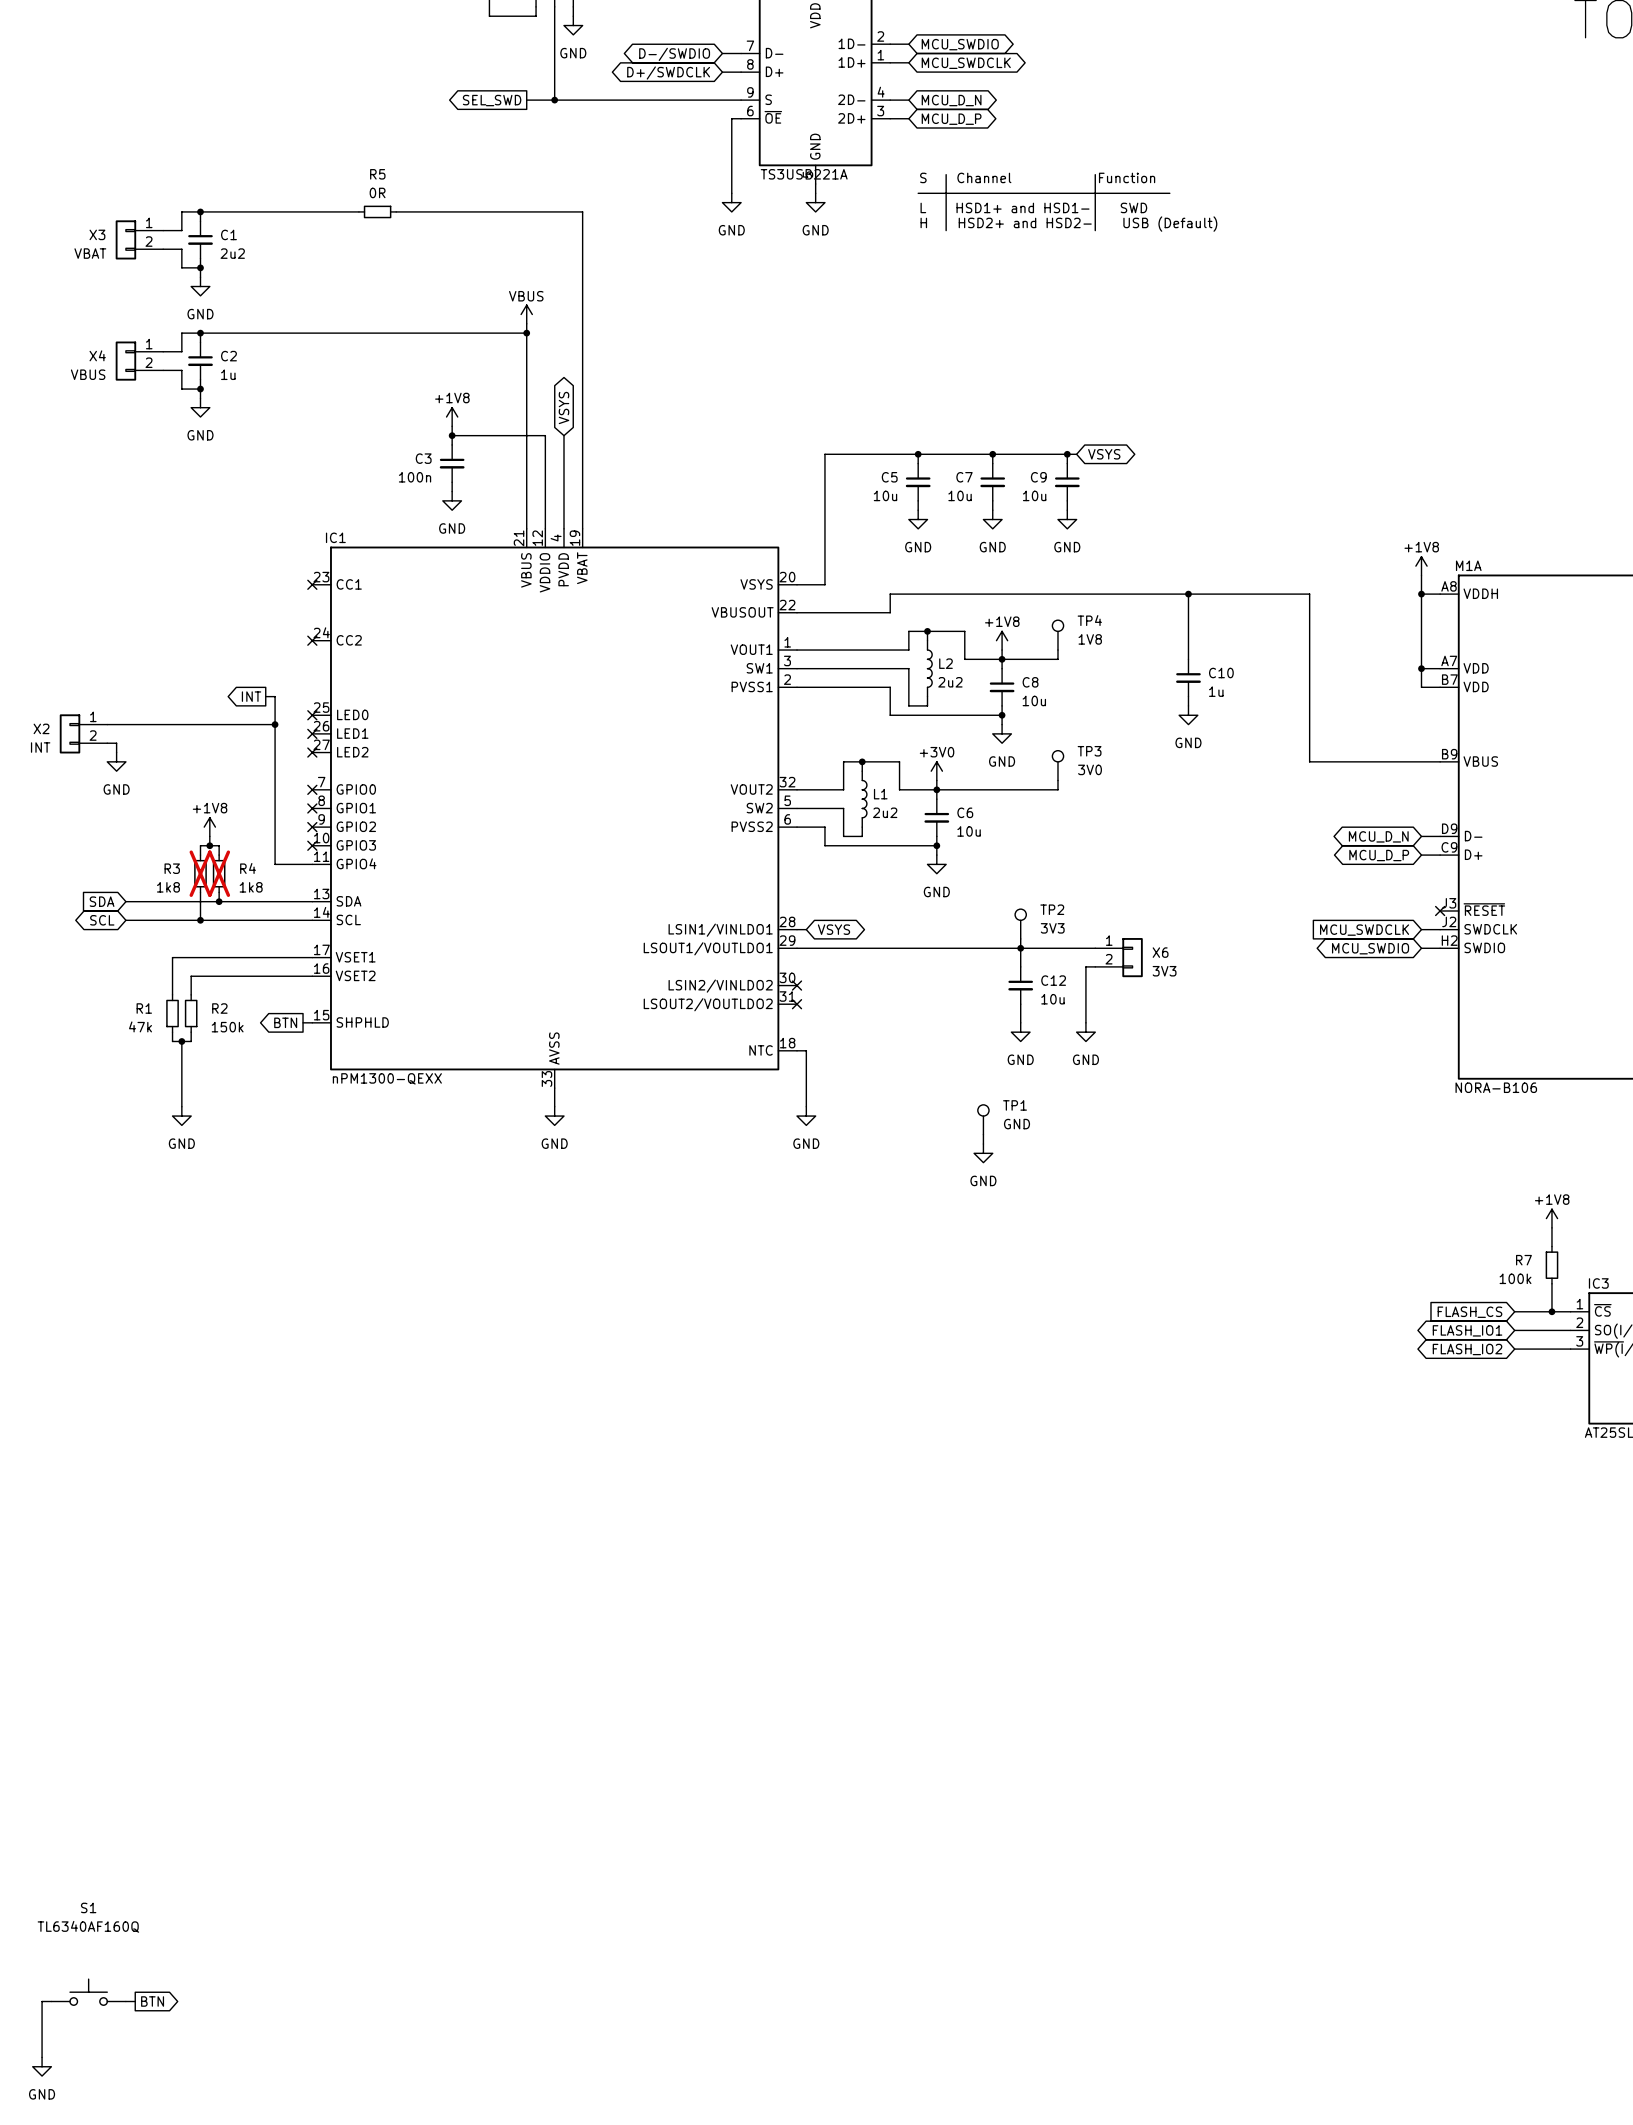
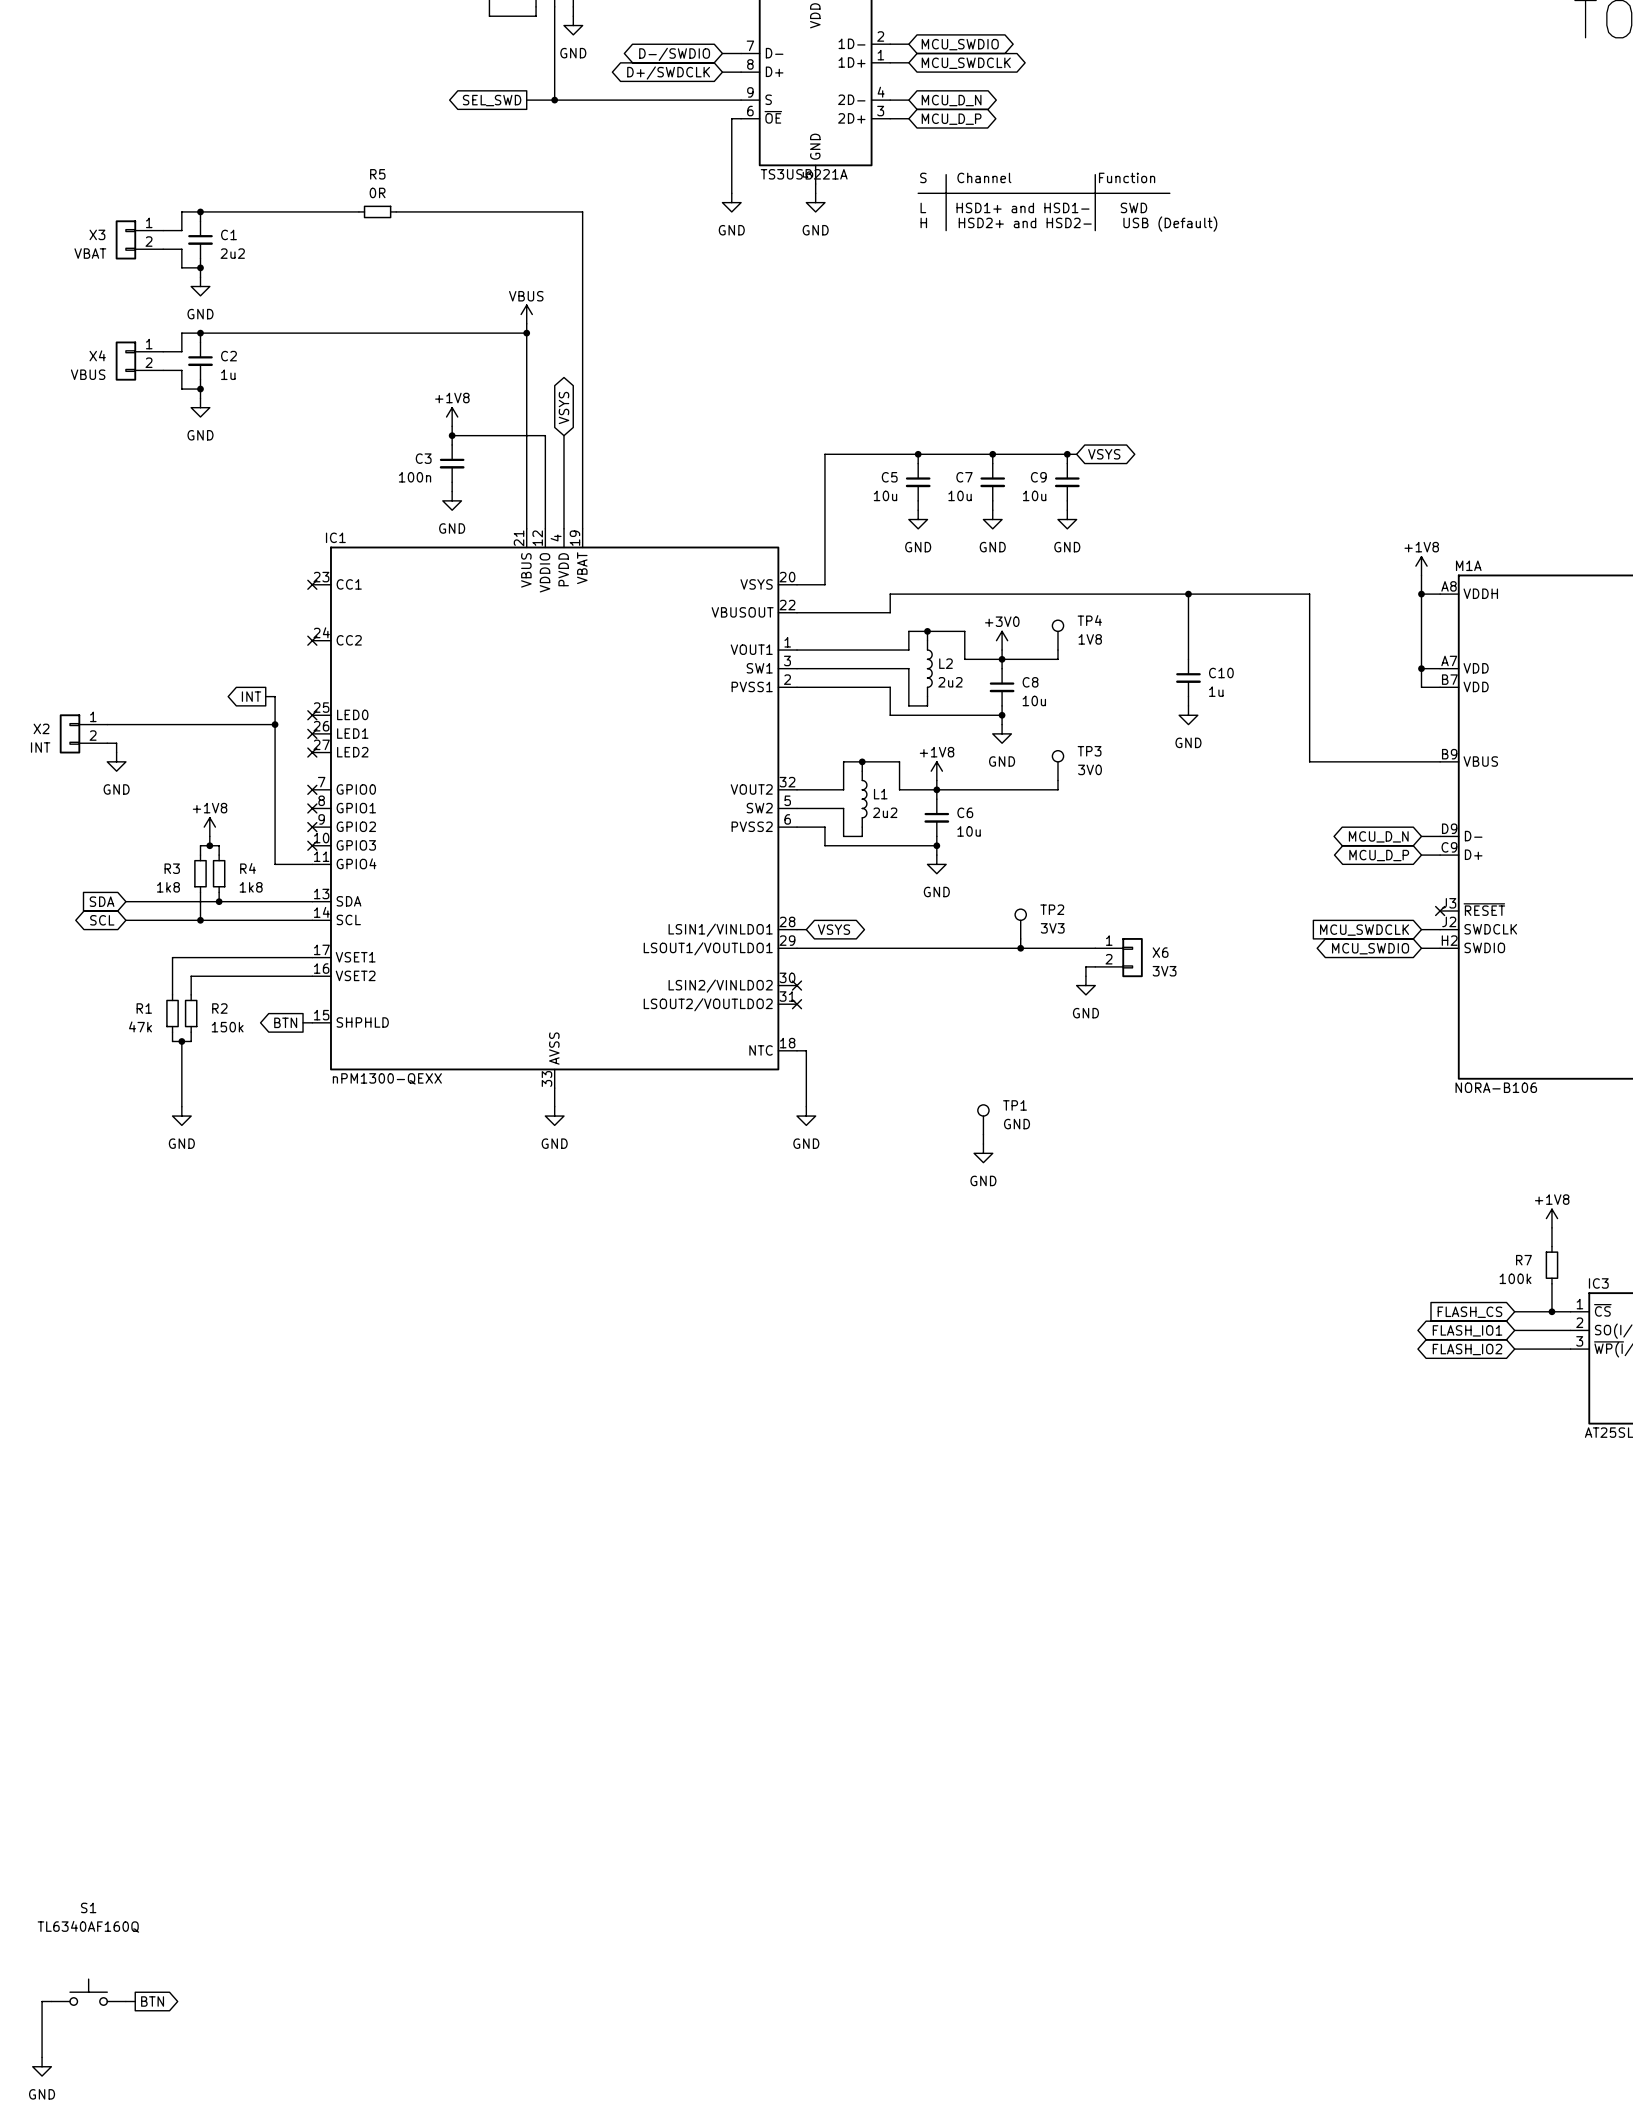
power symbol: +1V8 (1002, 640) -> +3V0 (1002, 640)
power symbol: +3V0 (936, 771) -> +1V8 (936, 771)
R3 do-not-place cross: (200, 873) -> none
R4 do-not-place cross: (219, 873) -> none
wire: (1020, 948) (1020, 966) -> none
wire: (1085, 976) (1085, 1022) -> none
C12: 10u (1020, 985) -> none
power symbol: none -> GND (1085, 985)
wire: (1020, 1004) (1020, 1022) -> none
power symbol: GND (1020, 1032) -> none
power symbol: GND (1085, 1032) -> none

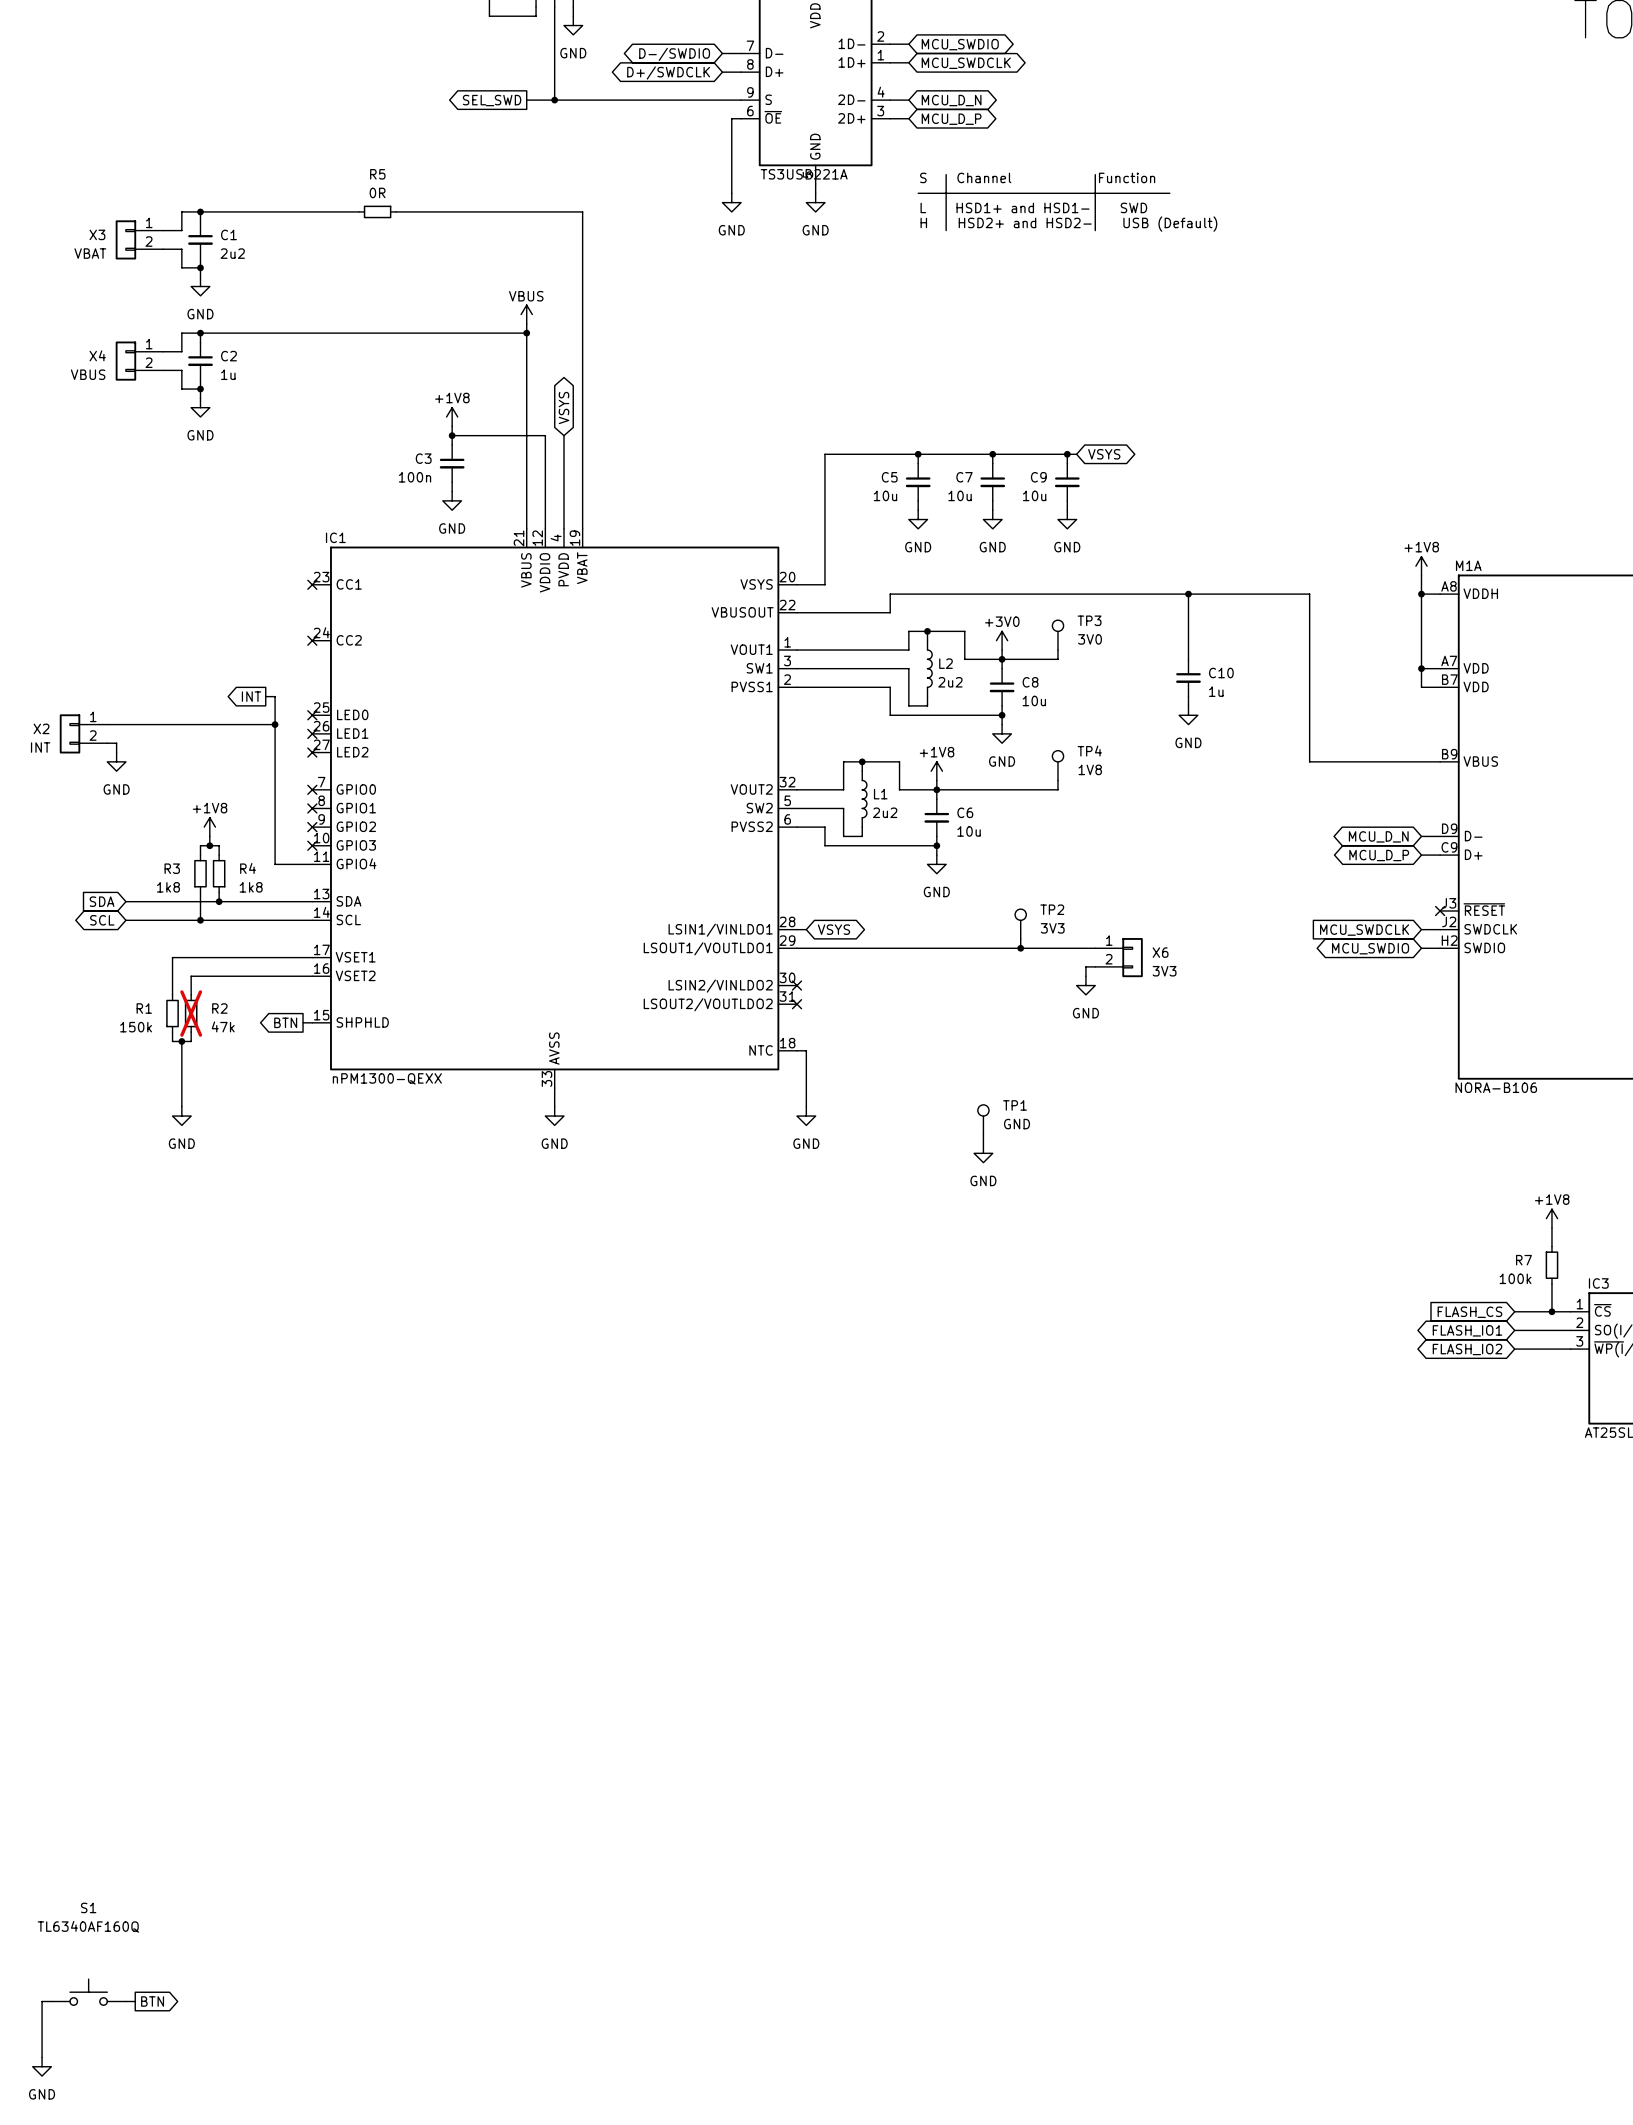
TP4 name: TP4 (1089, 620) -> TP3 (1089, 620)
TP4 value: 1V8 (1090, 639) -> 3V0 (1090, 639)
TP3 name: TP3 (1089, 751) -> TP4 (1089, 751)
TP3 value: 3V0 (1090, 769) -> 1V8 (1090, 769)
R2 do-not-place cross: none -> (191, 1013)
R1 value: 47k (140, 1026) -> 150k (136, 1027)
R2 value: 150k (227, 1027) -> 47k (223, 1026)

